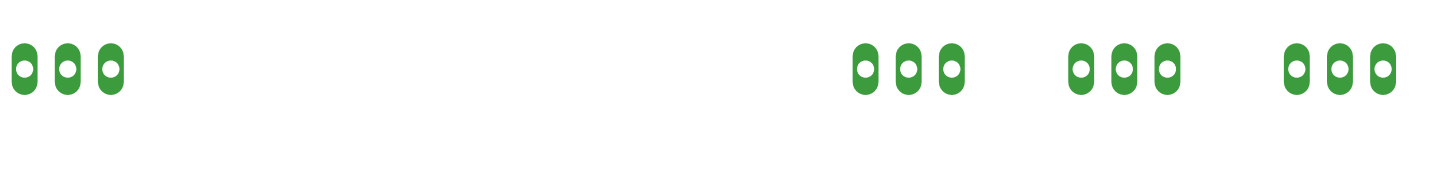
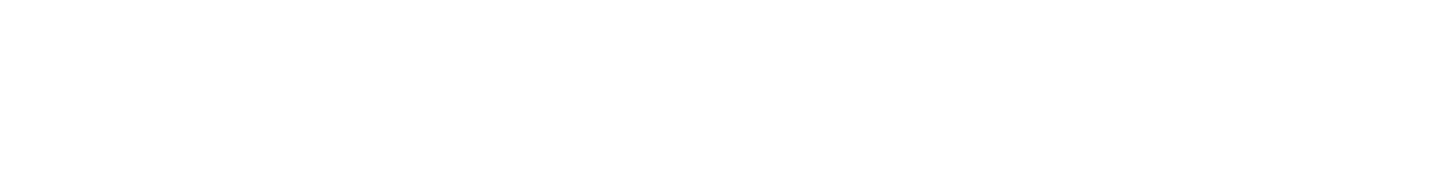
part: (67, 69) -> none
part: (908, 69) -> none
part: (1124, 69) -> none
part: (1339, 69) -> none

